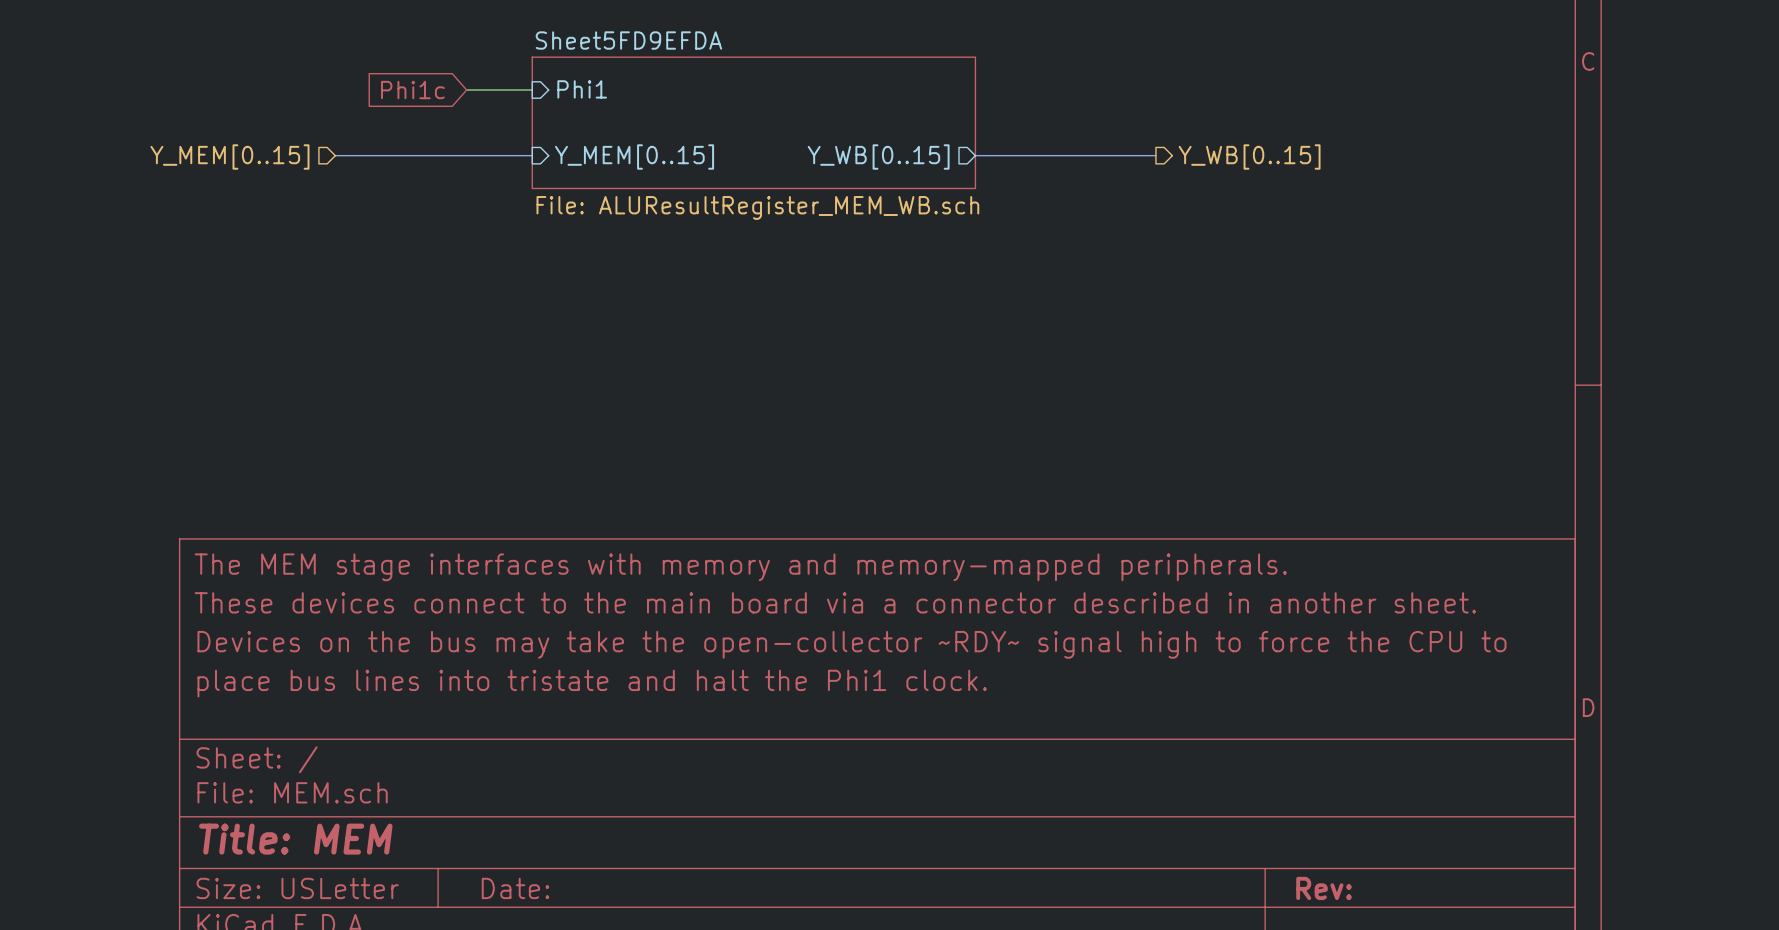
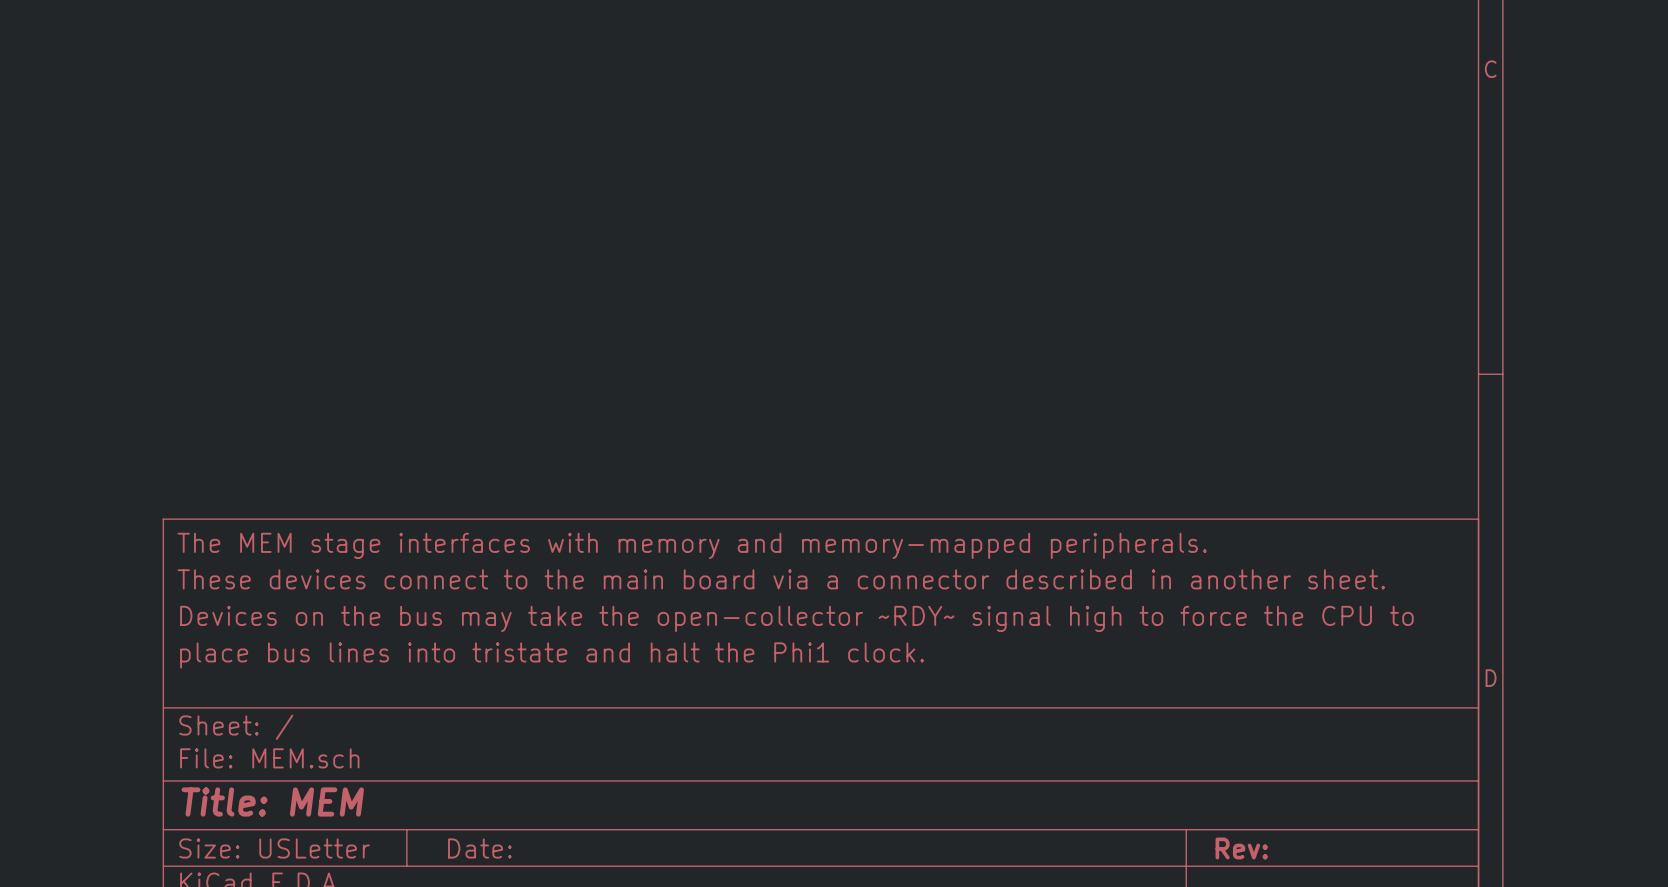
sheet pin: Phi1 (582, 89) -> none
global label: Phi1c (412, 90) -> none
wire: (466, 90) (532, 90) -> none
sheet Sheet5FD9EFDA: File: ALUResultRegister_MEM_WB.sch (753, 122) -> none
bus: (335, 155) (532, 155) -> none
bus: (975, 155) (1155, 155) -> none
hierarchical label: Y_MEM[0..15] (229, 157) -> none
sheet pin: Y_MEM[0..15] (634, 157) -> none
sheet pin: Y_WB[0..15] (878, 157) -> none
hierarchical label: Y_WB[0..15] (1249, 157) -> none

